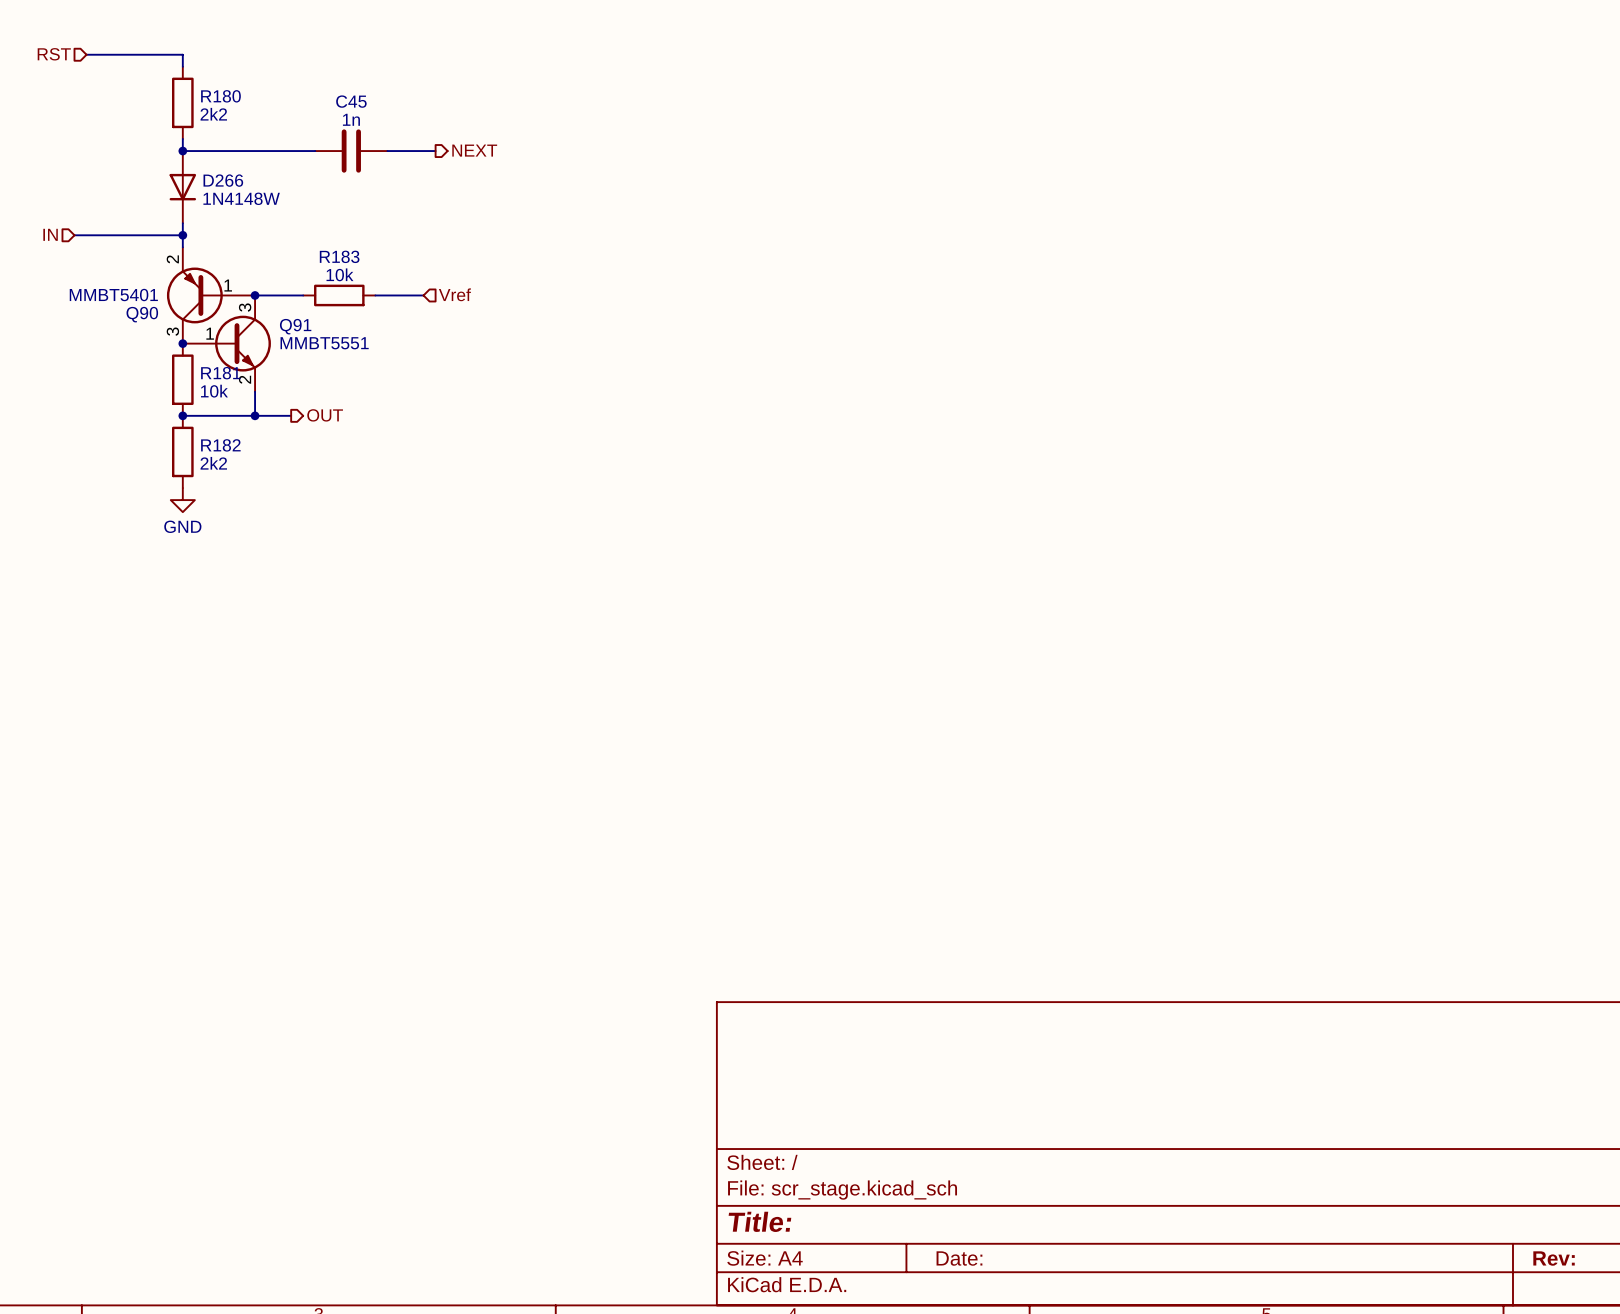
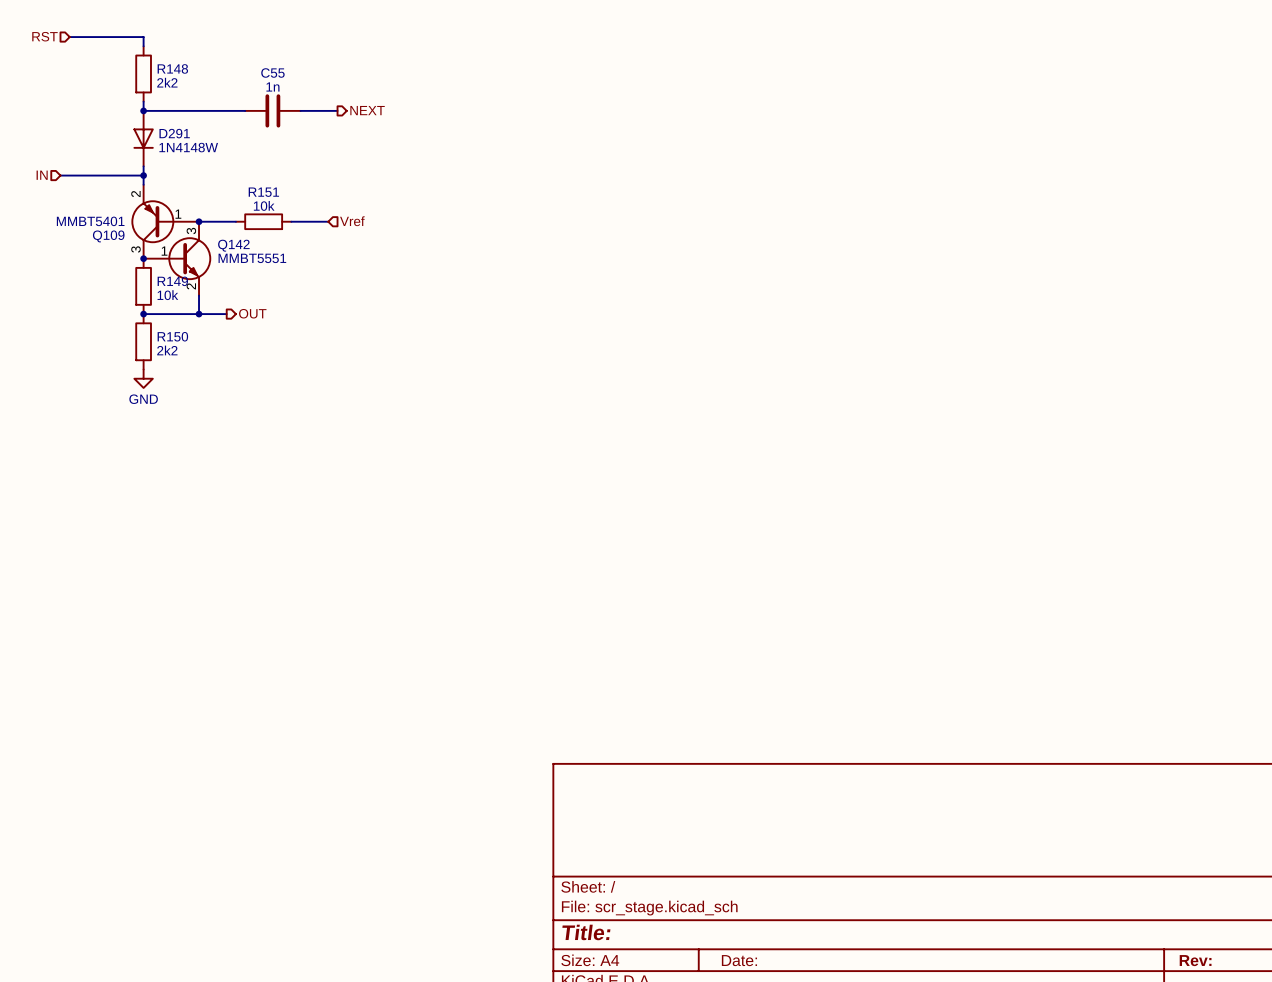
R180 name: R180 (220, 96) -> R148 (172, 68)
C45 name: C45 (351, 101) -> C55 (272, 72)
D266 name: D266 (223, 180) -> D291 (174, 133)
R183 name: R183 (339, 256) -> R151 (263, 192)
Q90 name: Q90 (142, 314) -> Q109 (108, 236)
Q91 name: Q91 (295, 326) -> Q142 (233, 245)
R181 name: R181 (220, 373) -> R149 (172, 281)
R182 name: R182 (220, 445) -> R150 (172, 336)

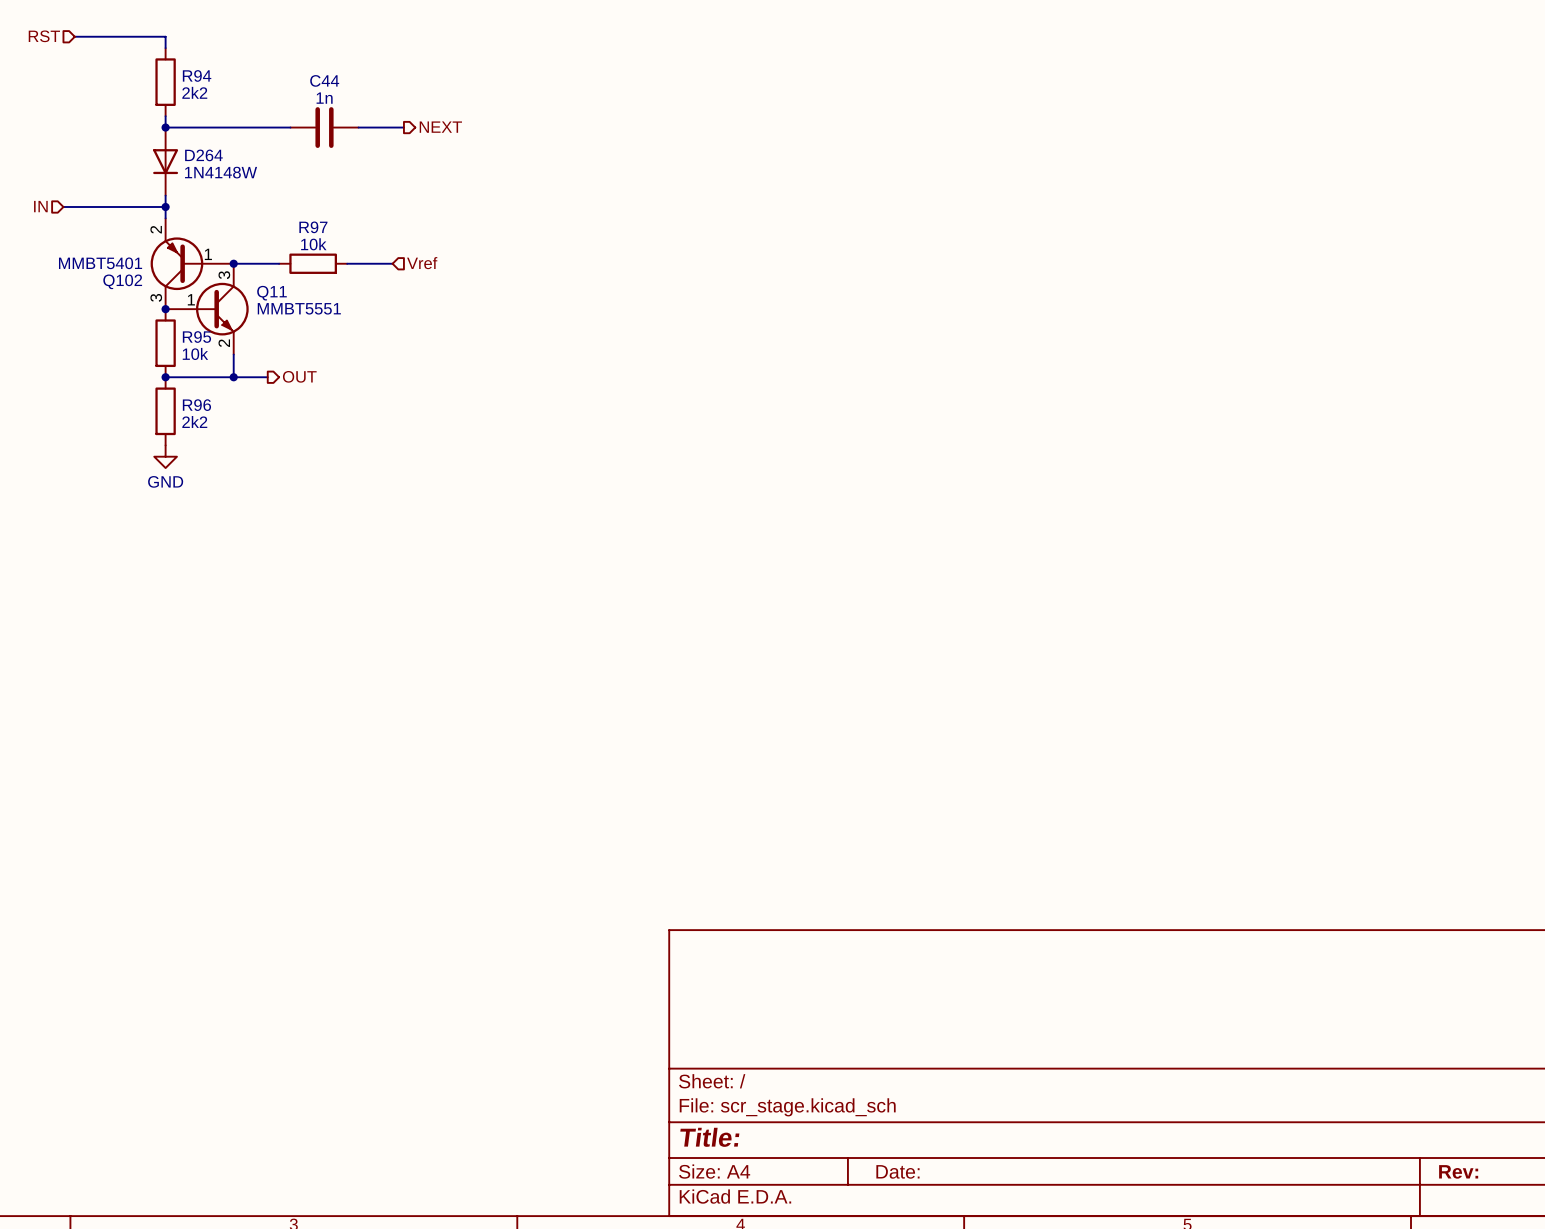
R148 name: R148 (172, 68) -> R94 (197, 75)
C55 name: C55 (272, 72) -> C44 (324, 80)
D291 name: D291 (174, 133) -> D264 (203, 155)
R151 name: R151 (263, 192) -> R97 (313, 227)
Q109 name: Q109 (108, 236) -> Q102 (122, 281)
Q142 name: Q142 (233, 245) -> Q11 (271, 293)
R149 name: R149 (172, 281) -> R95 (196, 337)
R150 name: R150 (172, 336) -> R96 (196, 405)

